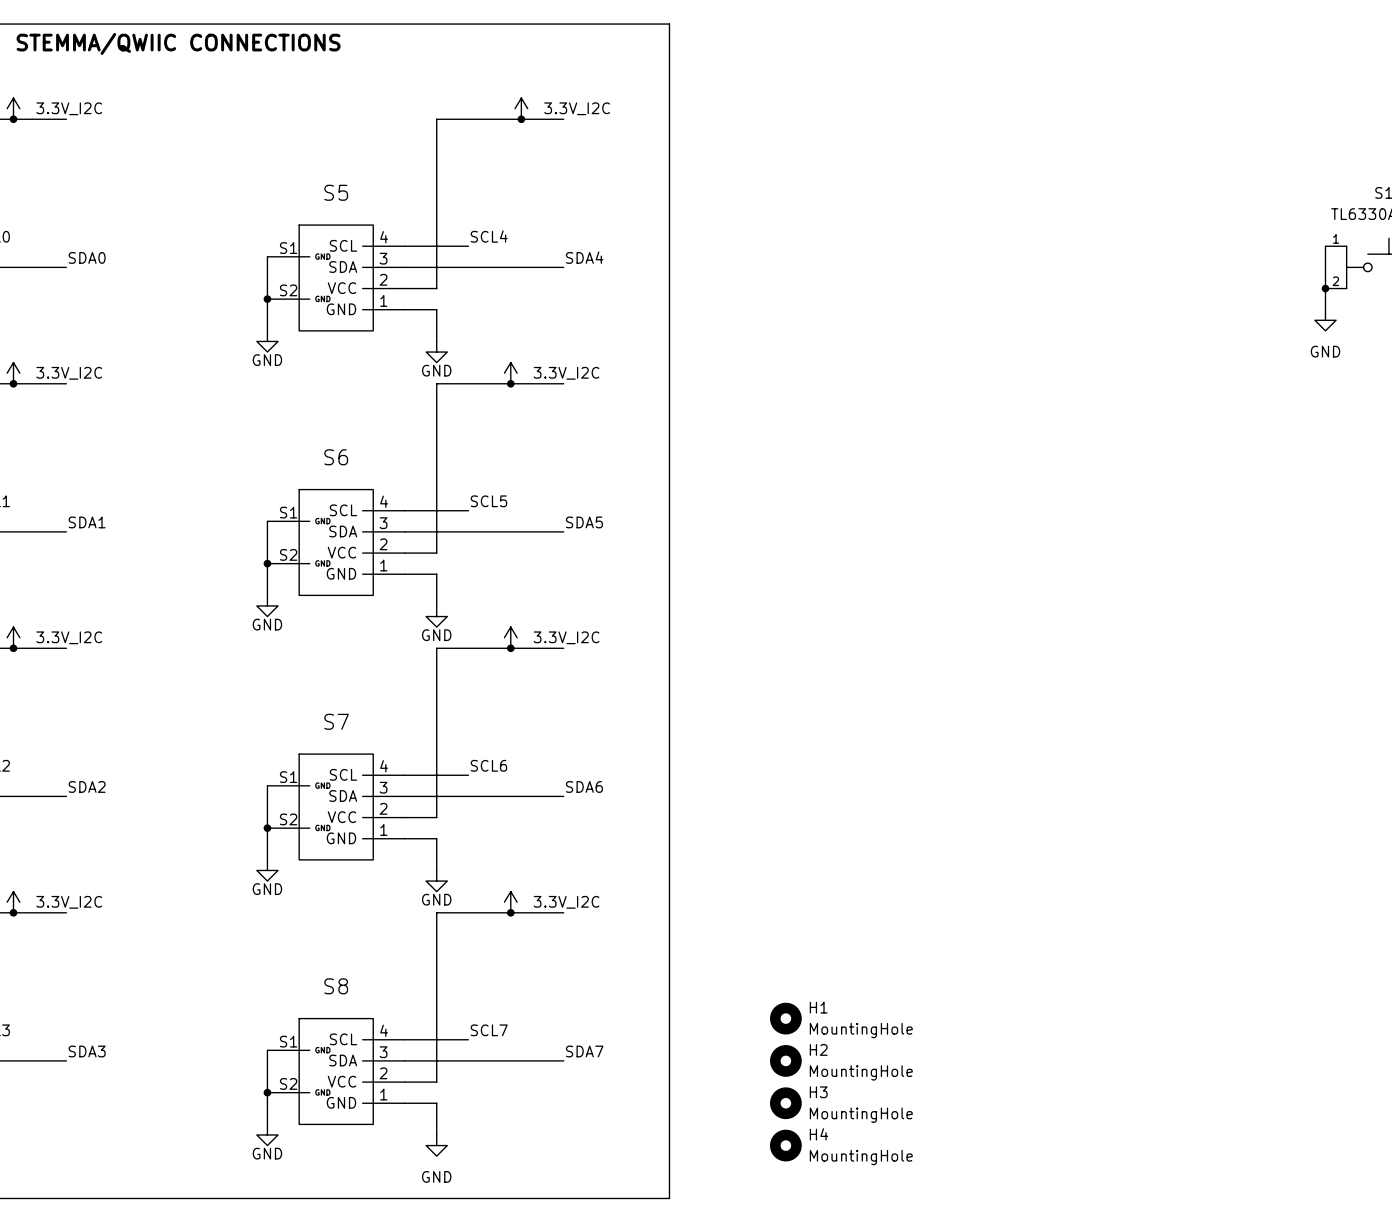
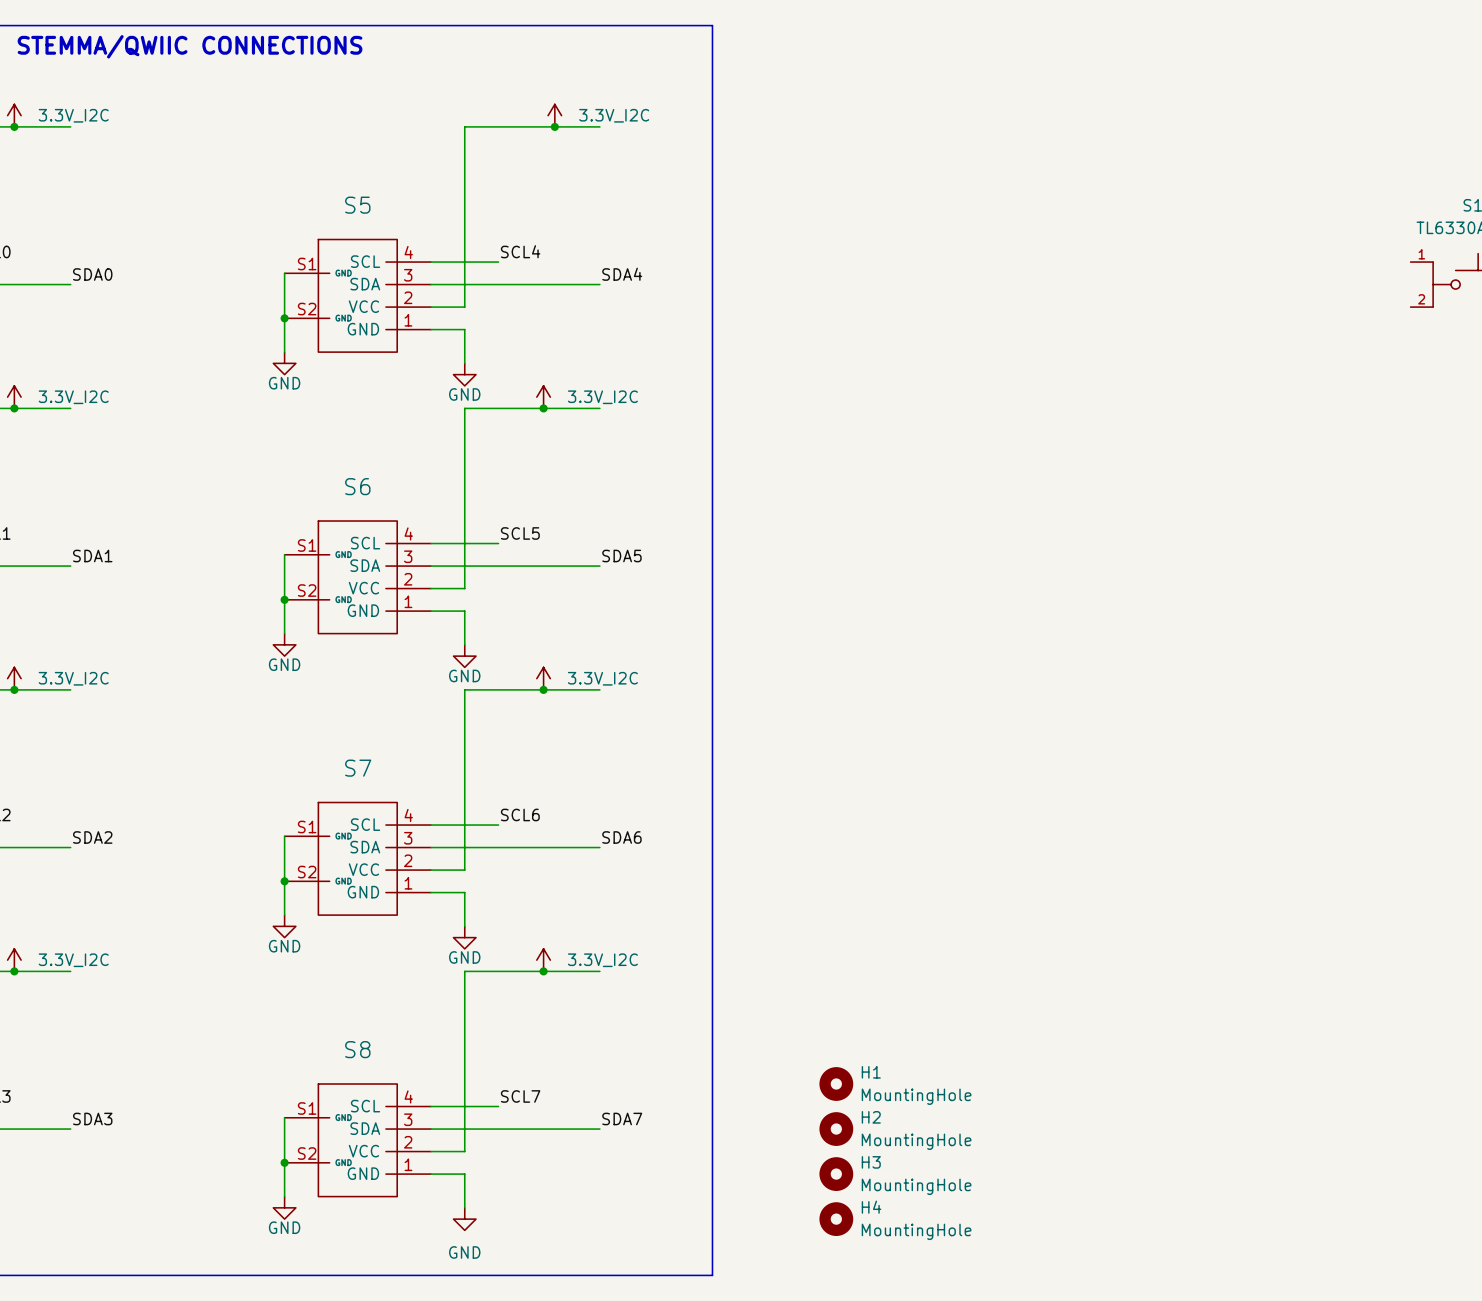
wire: (1325, 246) (1325, 309) -> none
junction: (1325, 288) -> none
power symbol: GND (1325, 320) -> none

